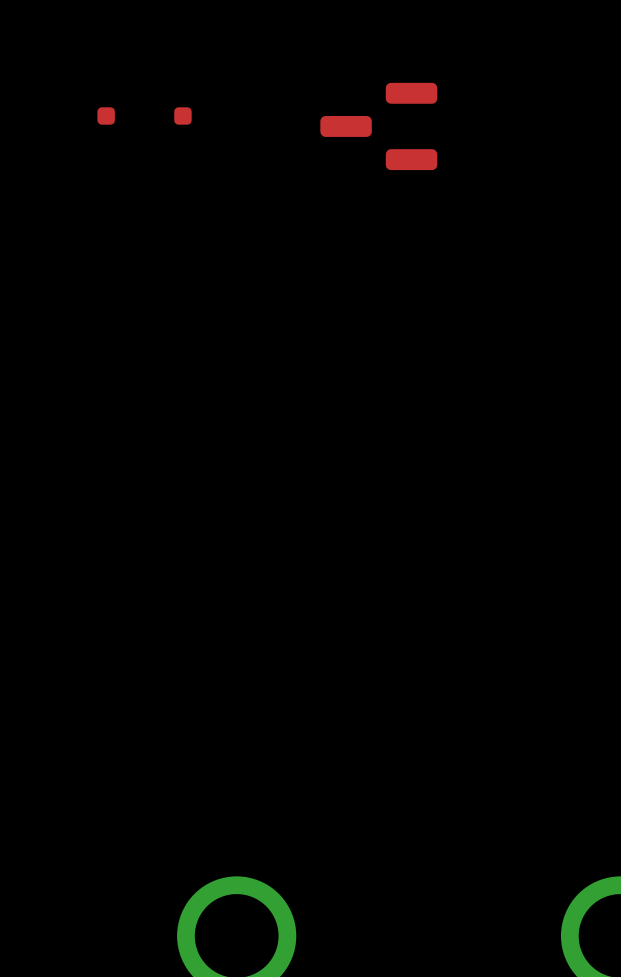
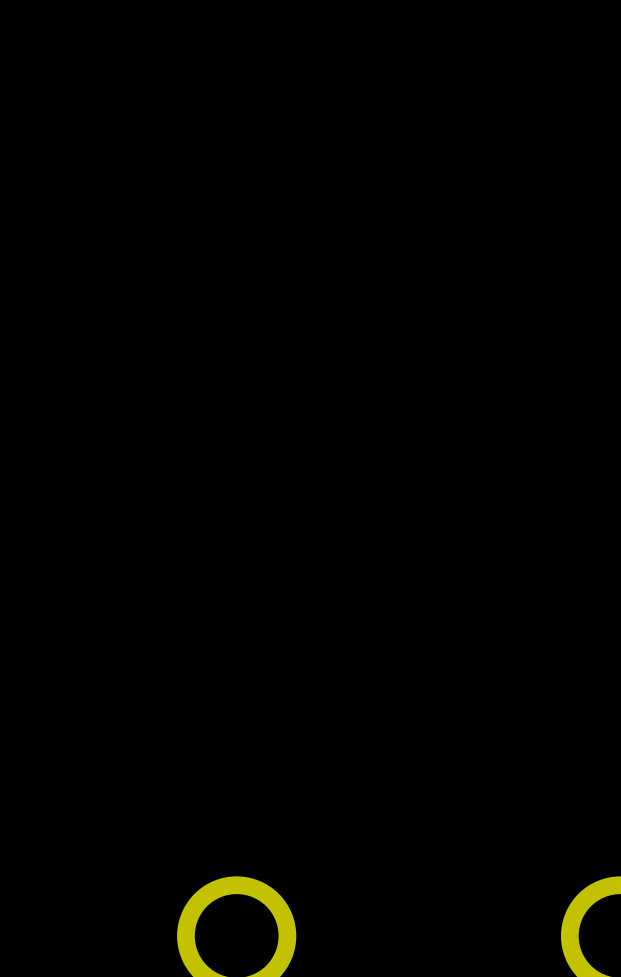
part: (144, 115) -> none
part: (378, 126) -> none

